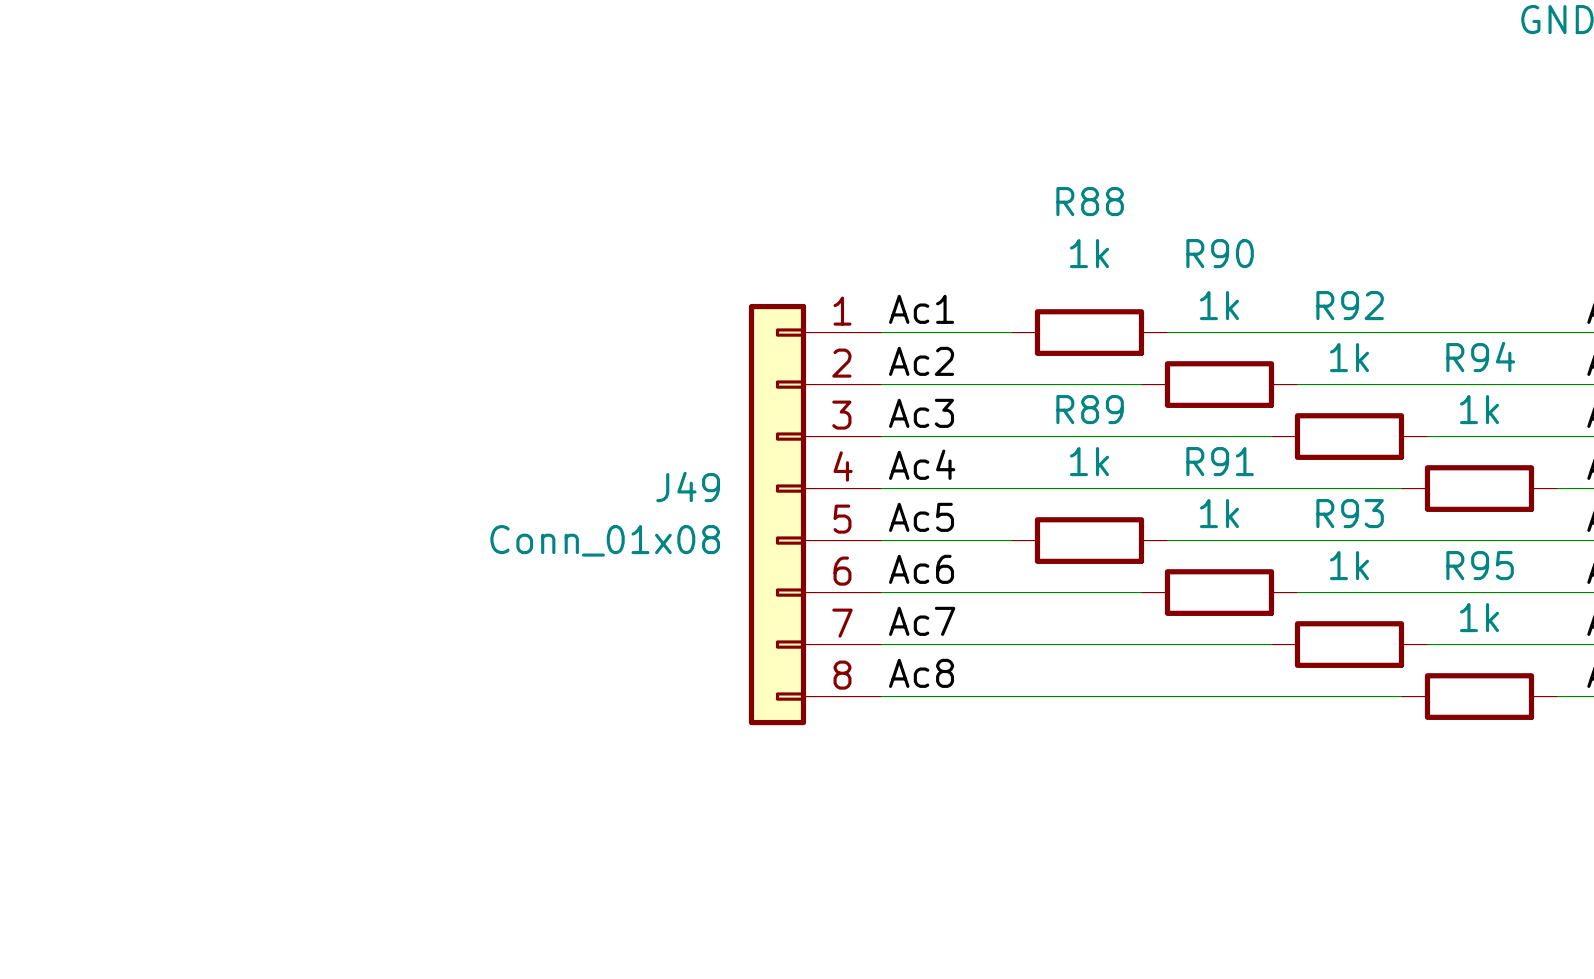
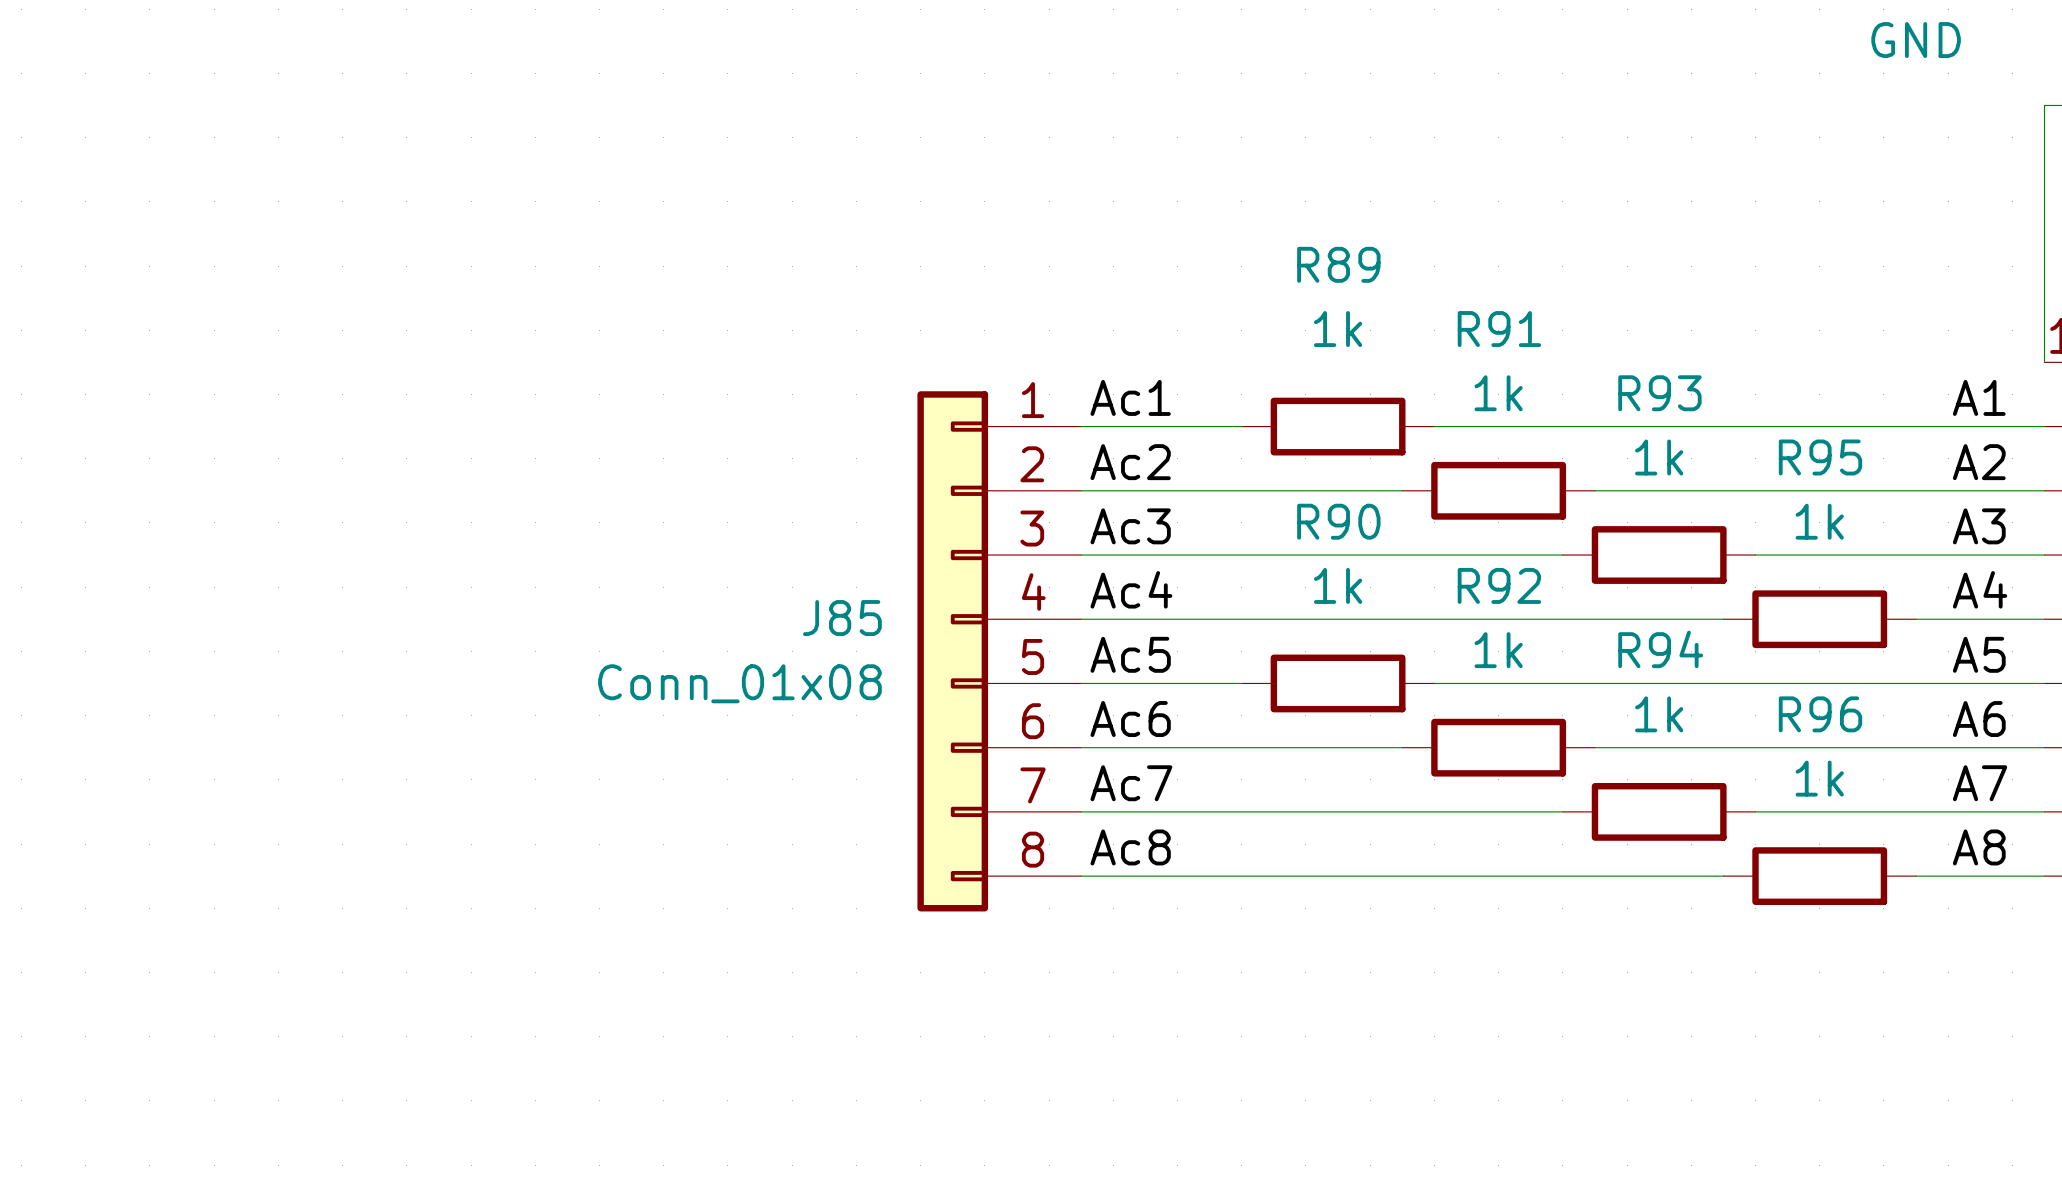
R88 name: R88 (1090, 201) -> R89 (1338, 264)
R90 name: R90 (1220, 253) -> R91 (1499, 329)
R92 name: R92 (1350, 305) -> R93 (1659, 393)
R94 name: R94 (1480, 356) -> R95 (1820, 457)
R89 name: R89 (1090, 409) -> R90 (1338, 521)
R91 name: R91 (1220, 461) -> R92 (1499, 585)
J49 name: J49 (688, 486) -> J85 (842, 618)
R93 name: R93 (1350, 513) -> R94 (1660, 649)
R95 name: R95 (1480, 565) -> R96 (1820, 714)

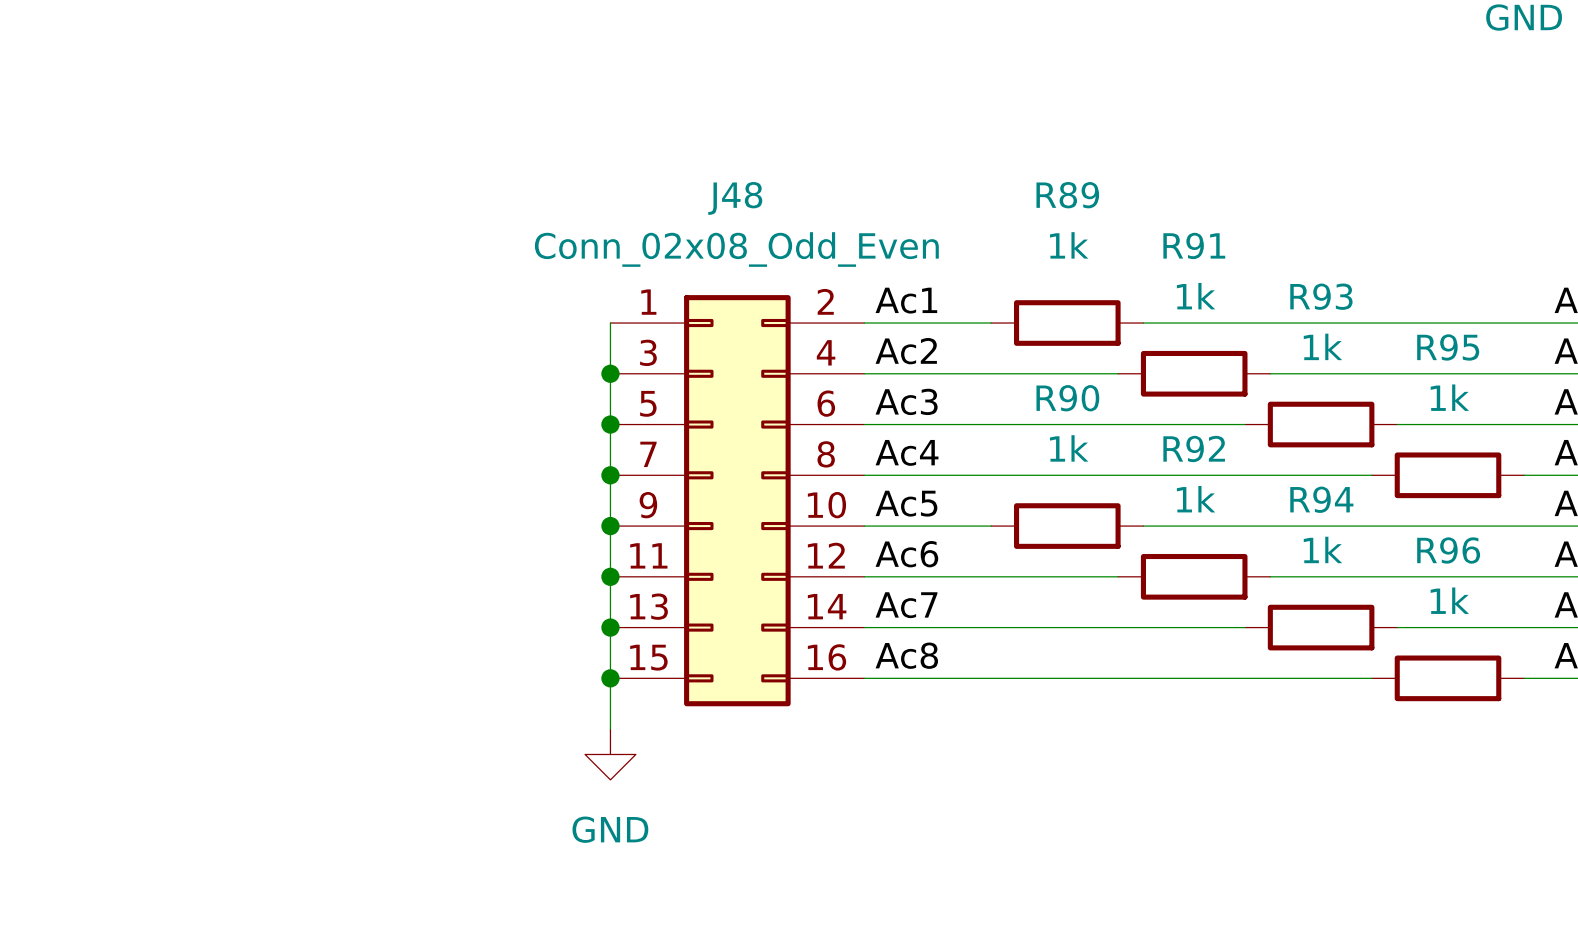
wire: none -> (610, 323) (610, 729)
junction: none -> (610, 373)
junction: none -> (610, 424)
junction: none -> (610, 475)
J48: none -> Conn_02x08_Odd_Even (737, 500)
J85: Conn_01x08 (999, 651) -> none
junction: none -> (610, 526)
junction: none -> (610, 576)
junction: none -> (610, 627)
junction: none -> (610, 678)
power symbol: none -> GND (610, 754)

